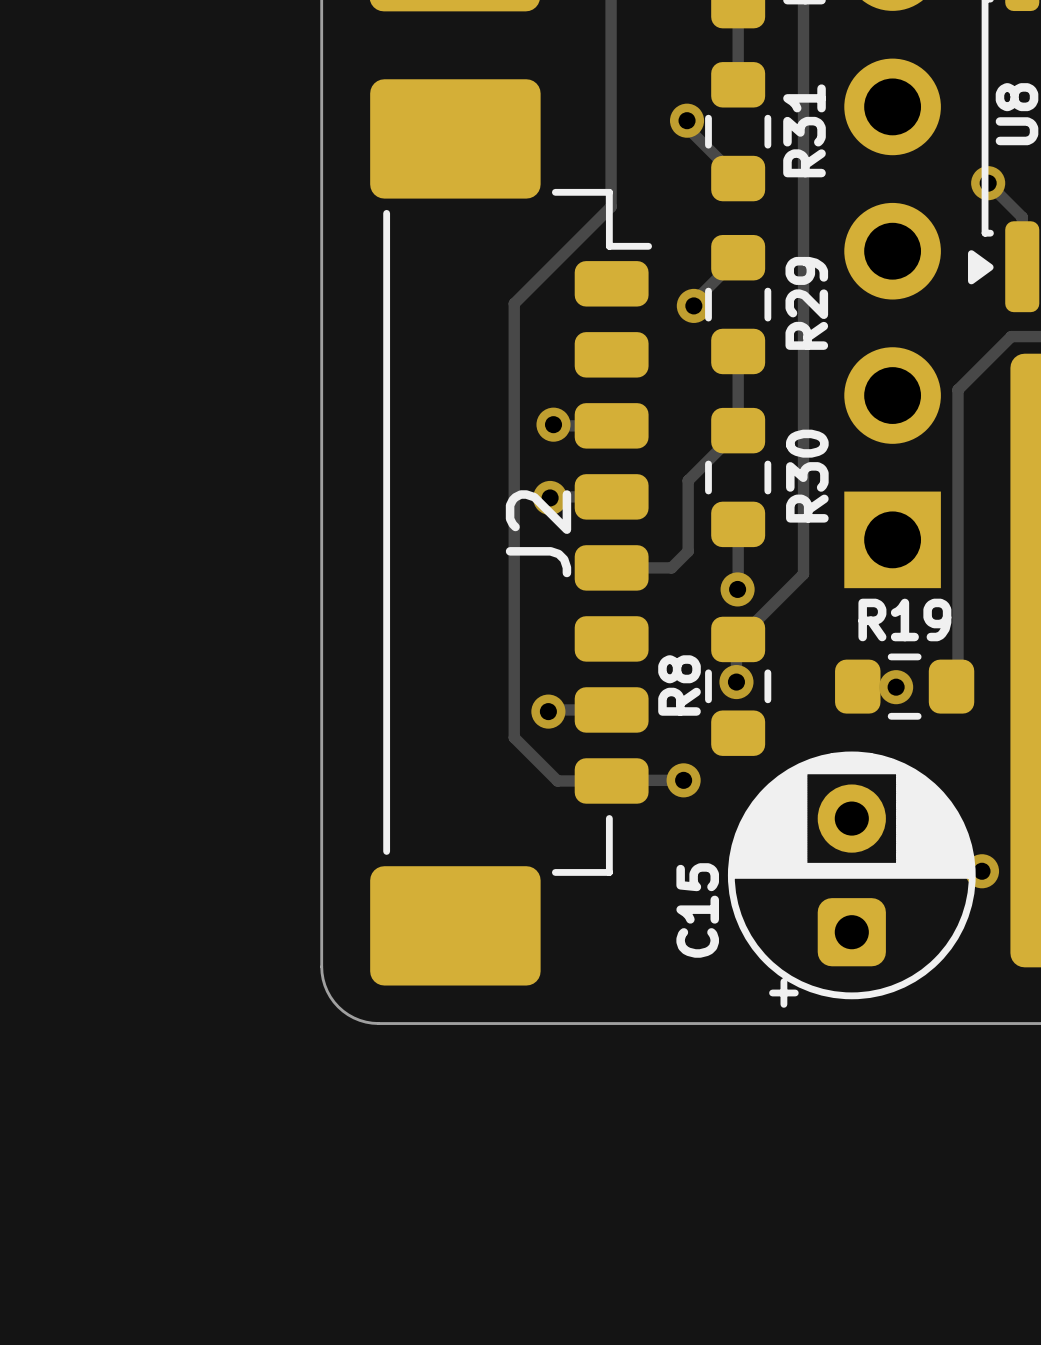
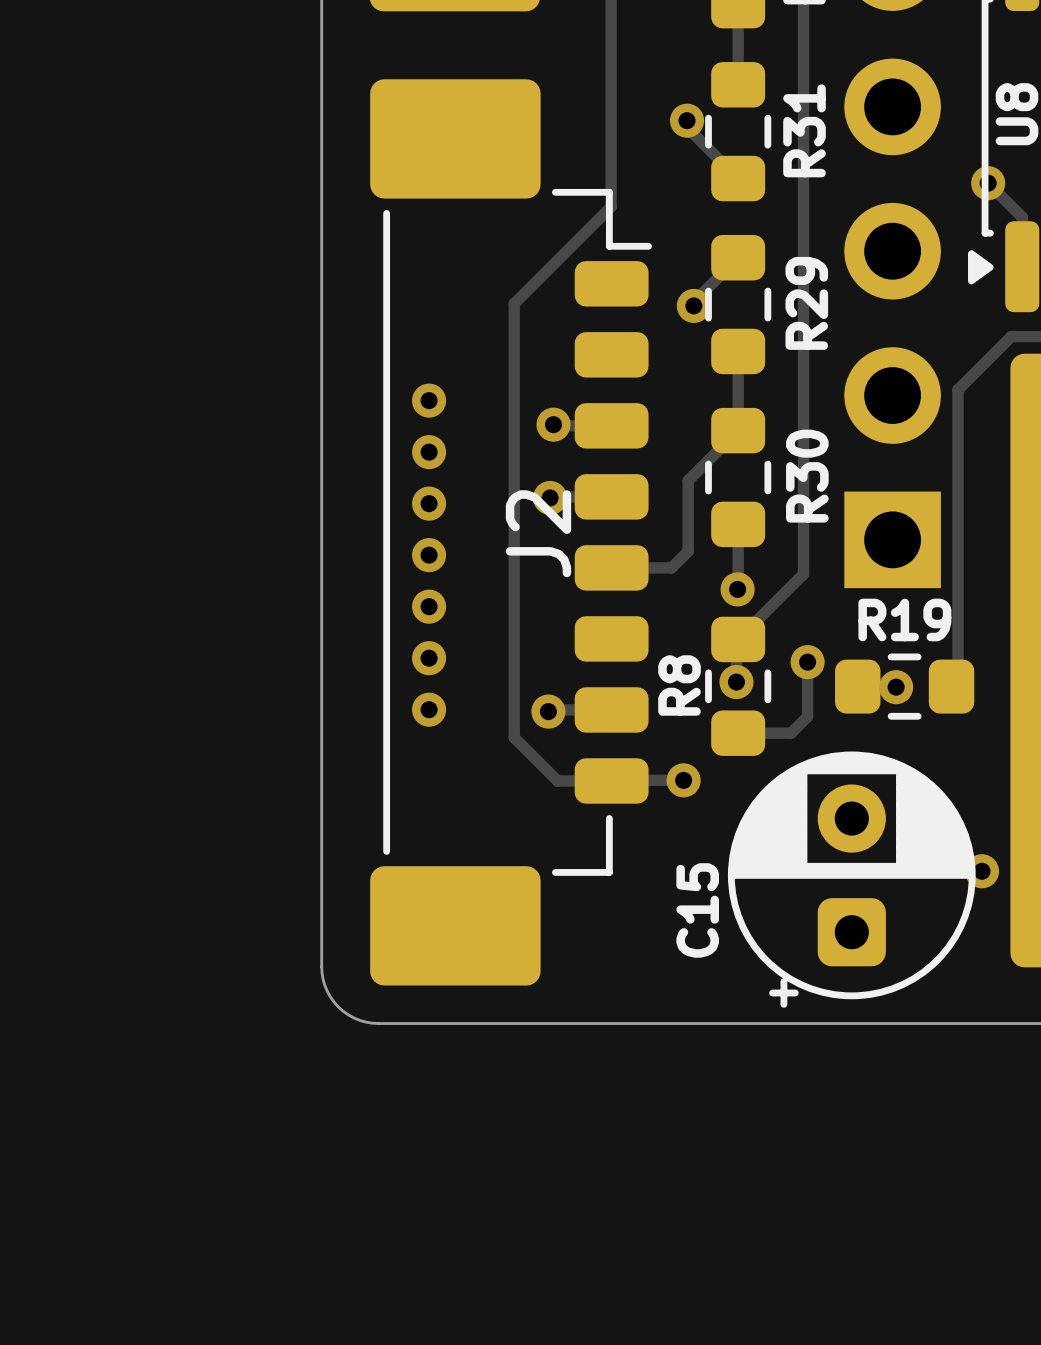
via: none -> (429, 400)
via: none -> (429, 452)
via: none -> (429, 503)
via: none -> (429, 555)
via: none -> (429, 606)
via: none -> (429, 658)
track: none -> (807, 662) (807, 716) (791, 733) (738, 733)
via: none -> (807, 662)
via: none -> (429, 709)

